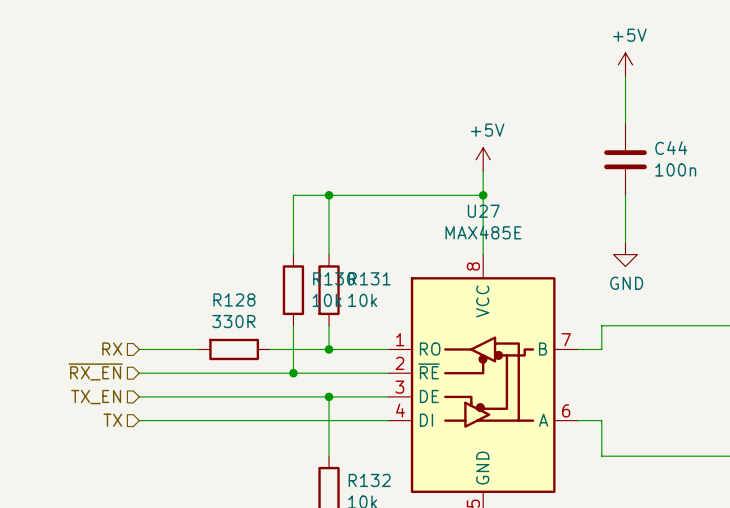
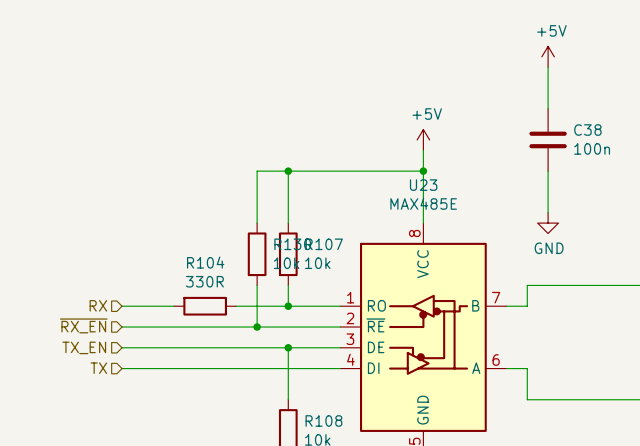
C44 name: C44 (671, 148) -> C38 (587, 130)
U27 name: U27 (483, 211) -> U23 (423, 185)
R131 name: R131 (369, 278) -> R107 (324, 244)
R128 name: R128 (234, 299) -> R104 (205, 262)
R132 name: R132 (369, 480) -> R108 (323, 420)

